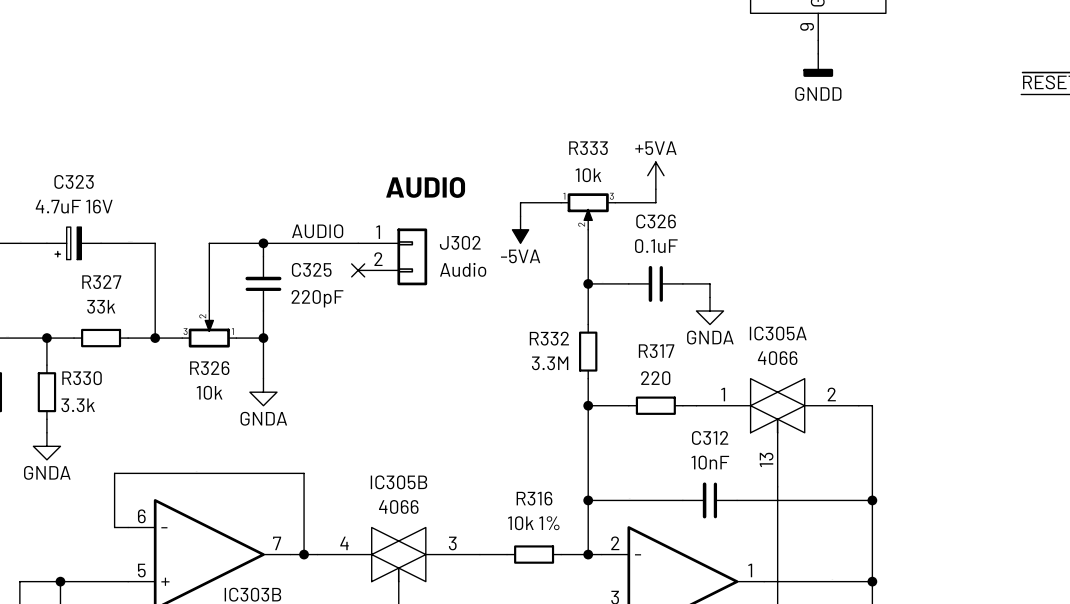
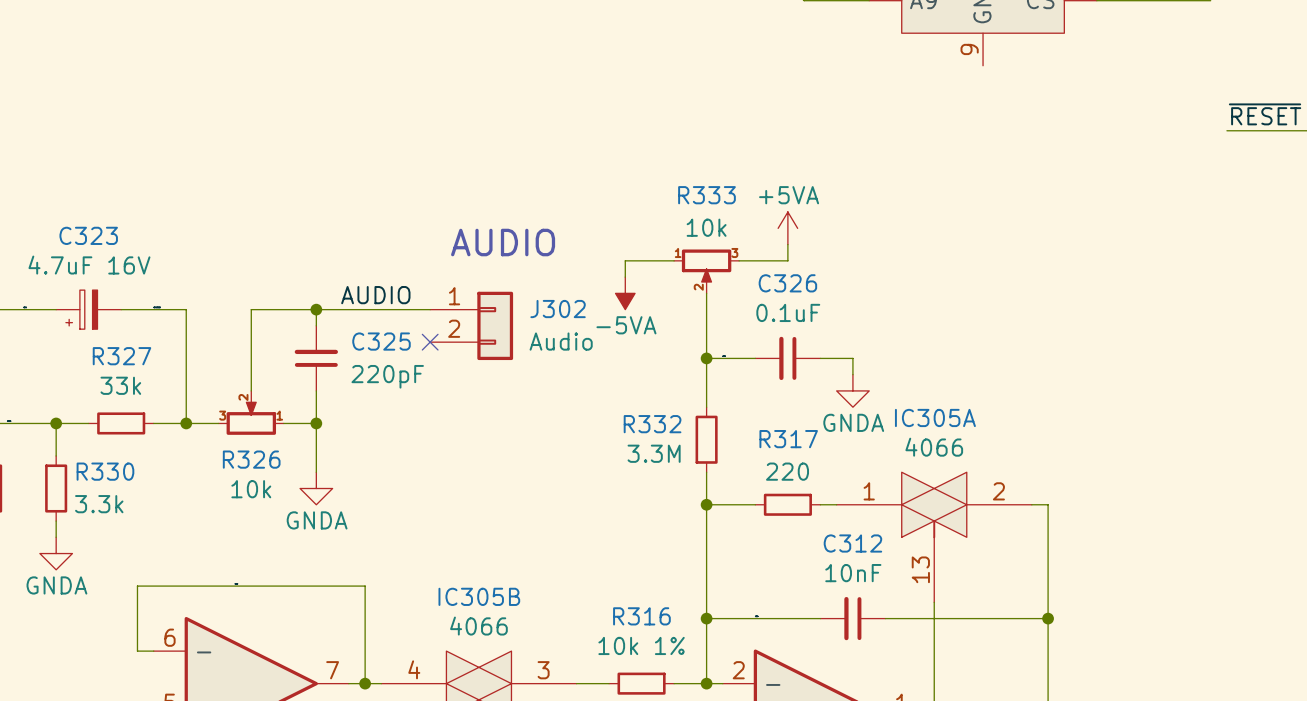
wire: (818, 40) (818, 53) -> none
power symbol: GNDD (818, 65) -> none

